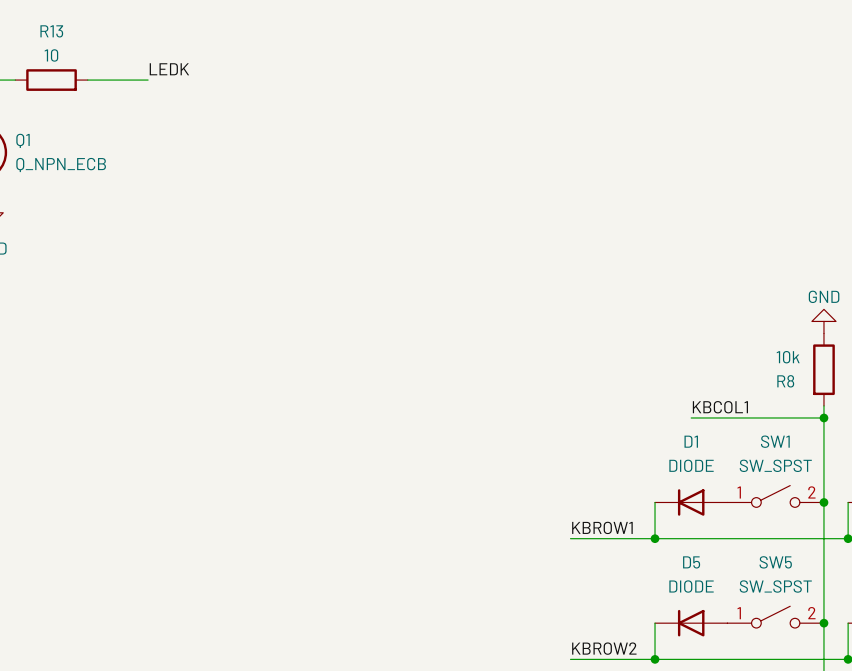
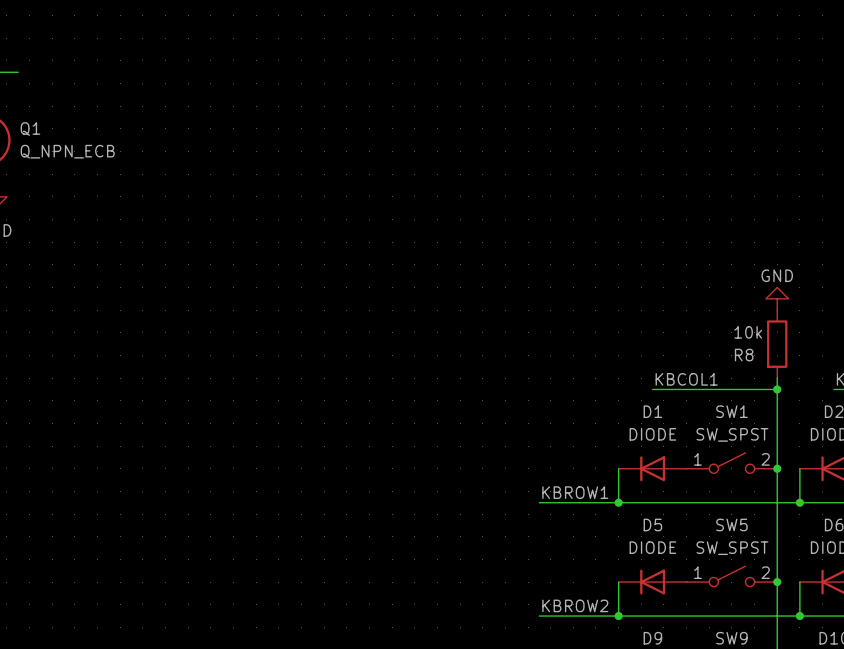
label: LEDK (169, 69) -> none
R13: 10 (51, 80) -> none
wire: (87, 80) (148, 80) -> none

